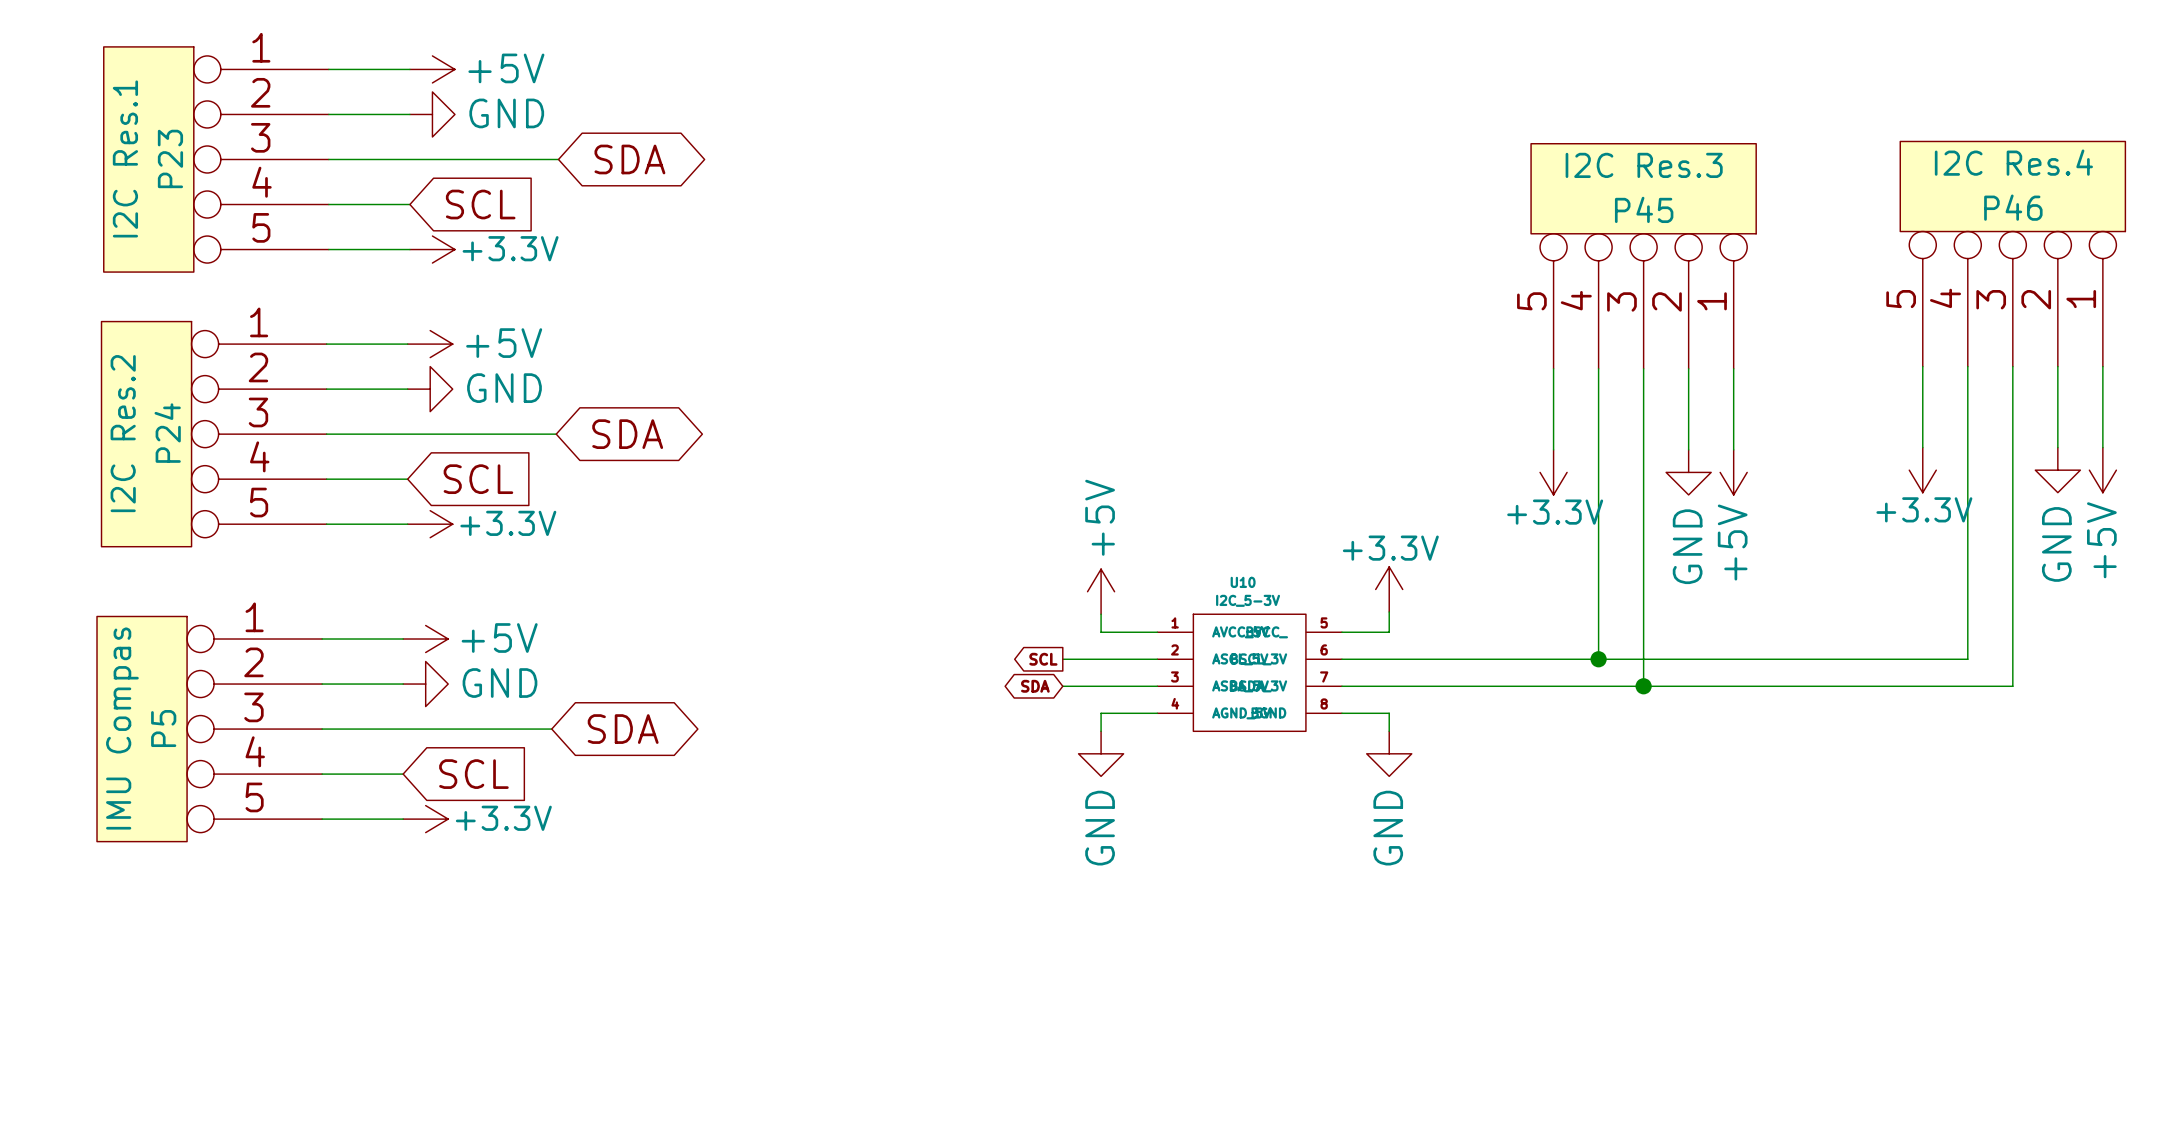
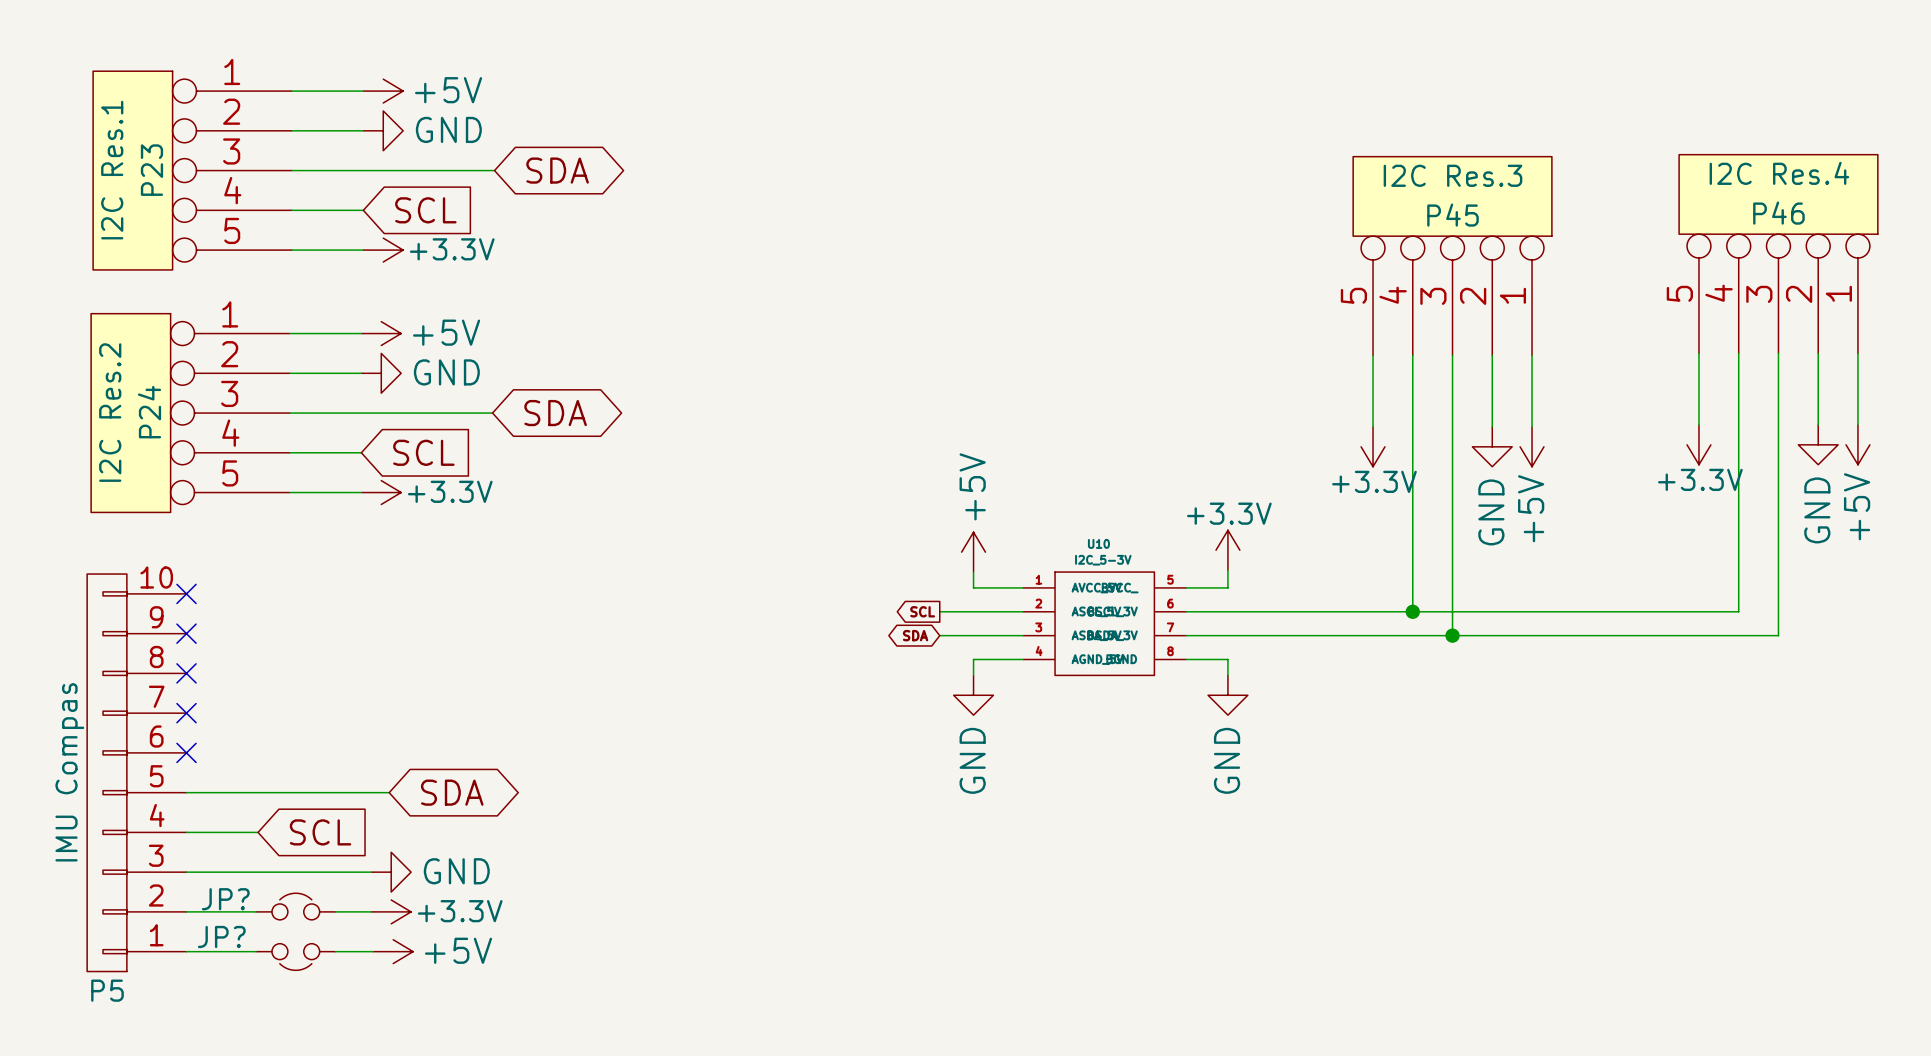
P5 symbol: [97, 616, 323, 842] -> [87, 574, 187, 972]
no-connect mark: none -> (186, 593)
wire: (322, 639) (403, 639) -> none
power symbol position: +5V (425, 639) -> +5V (393, 951)
no-connect mark: none -> (186, 633)
wire: (322, 684) (403, 684) -> none
power symbol position: GND (425, 684) -> GND (391, 872)
P5 name position: P5 (163, 728) -> P5 (107, 990)
no-connect mark: none -> (186, 673)
wire: (322, 729) (551, 729) -> (186, 792) (389, 792)
global label position: SDA (623, 729) -> SDA (452, 792)
no-connect mark: none -> (186, 713)
wire: (322, 774) (403, 774) -> (186, 832) (258, 832)
global label position: SCL (473, 774) -> SCL (320, 832)
no-connect mark: none -> (186, 752)
wire: (322, 819) (403, 819) -> none
power symbol position: +3.3V (425, 819) -> +3.3V (391, 911)
wire: none -> (186, 872) (371, 872)
JP?: none -> (295, 906)
wire: none -> (186, 911) (256, 911)
wire: none -> (335, 911) (371, 911)
wire: none -> (186, 951) (256, 951)
wire: none -> (335, 951) (373, 951)
JP?: none -> (295, 957)

